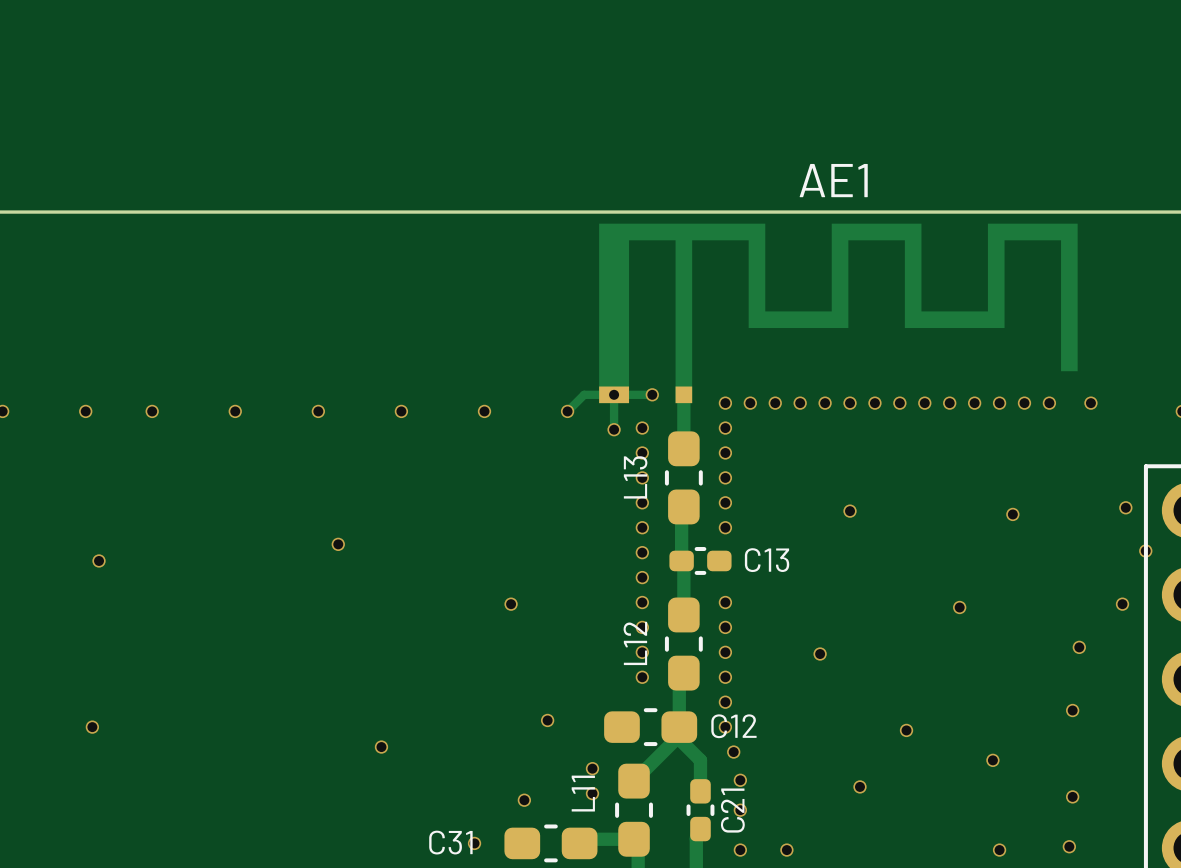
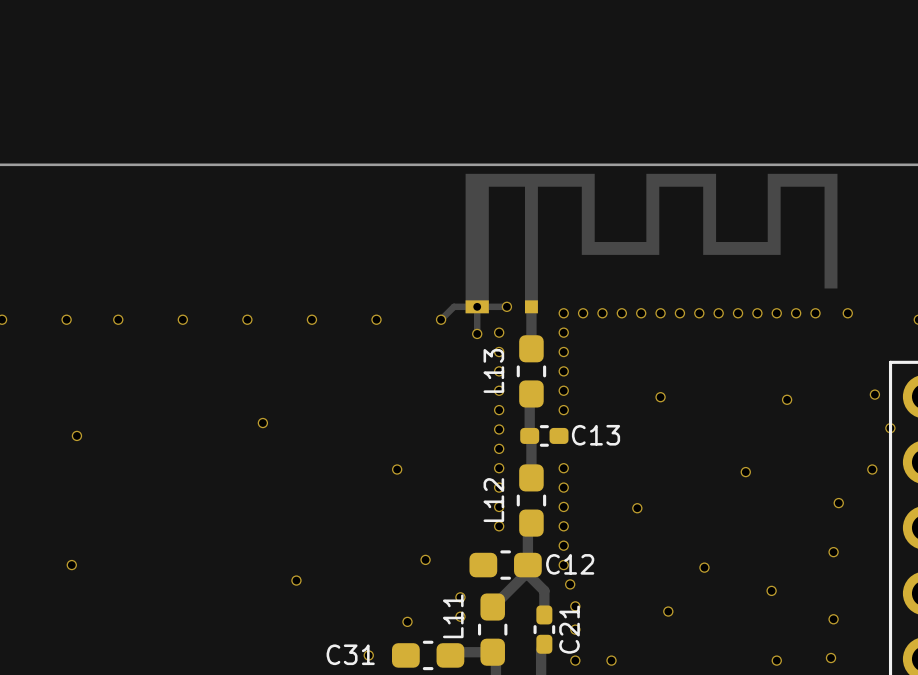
AE1 name: AE1 (833, 180) -> none

